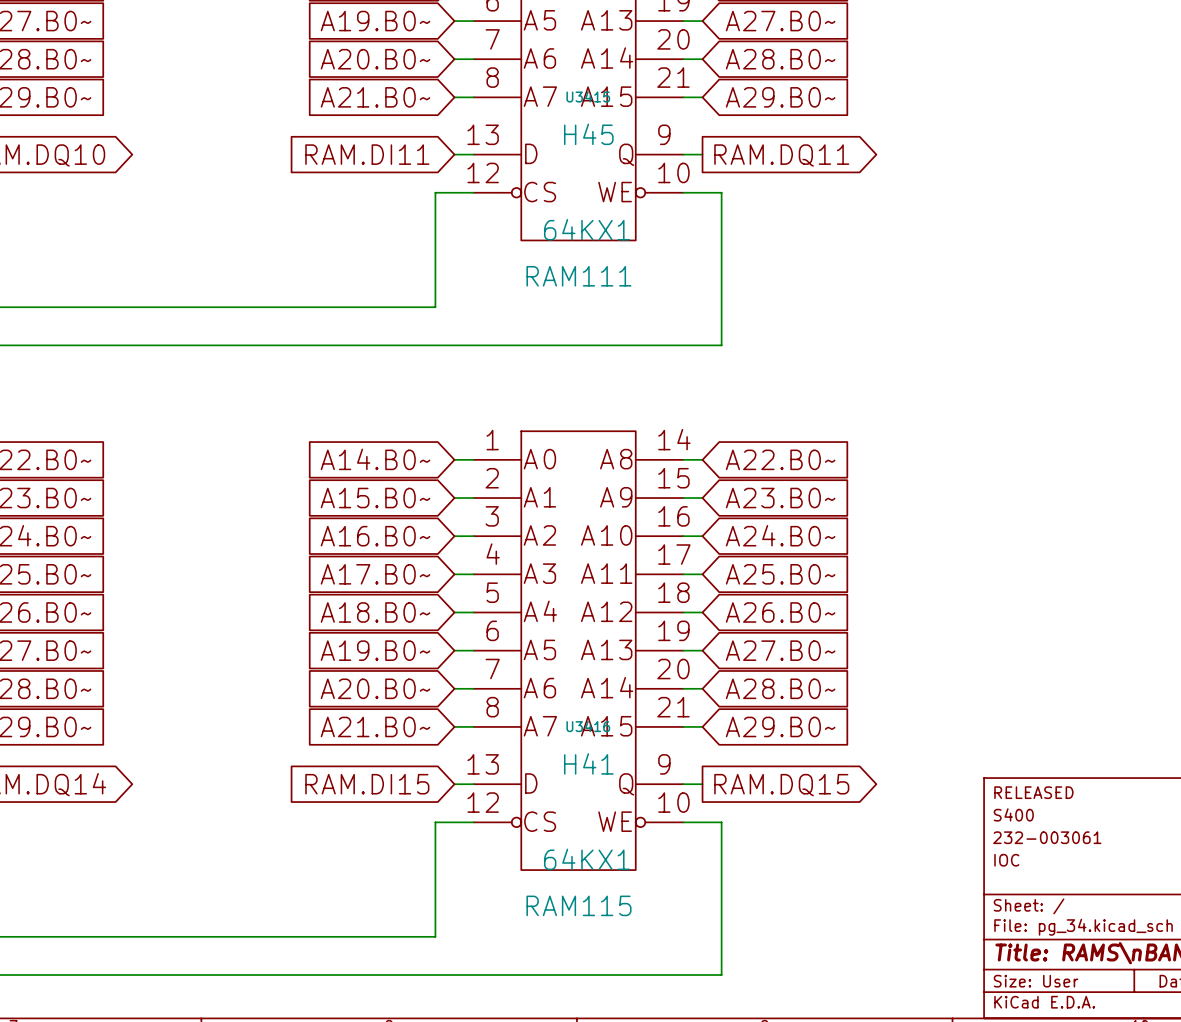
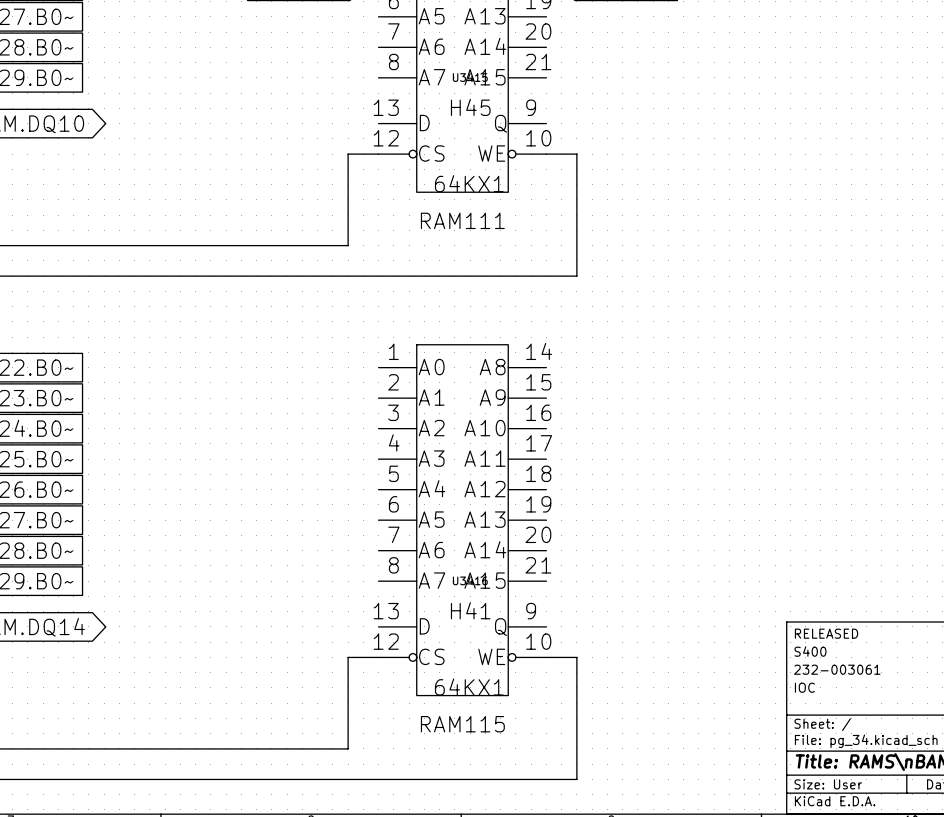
global label: A19.B0~ (375, 21) -> none
wire: (454, 21) (473, 21) -> none
wire: (683, 21) (702, 21) -> none
global label: A27.B0~ (780, 21) -> none
global label: A20.B0~ (375, 59) -> none
wire: (454, 59) (473, 59) -> none
wire: (683, 59) (702, 59) -> none
global label: A28.B0~ (780, 59) -> none
global label: A21.B0~ (375, 97) -> none
wire: (454, 97) (473, 97) -> none
wire: (683, 97) (702, 97) -> none
global label: A29.B0~ (780, 97) -> none
global label: RAM.DI11 (367, 154) -> none
wire: (454, 154) (473, 154) -> none
wire: (683, 154) (702, 154) -> none
global label: RAM.DQ11 (781, 155) -> none
global label: A14.B0~ (375, 459) -> none
wire: (454, 459) (473, 459) -> none
wire: (683, 459) (702, 459) -> none
global label: A22.B0~ (780, 459) -> none
global label: A15.B0~ (375, 498) -> none
wire: (454, 498) (473, 498) -> none
wire: (683, 498) (702, 498) -> none
global label: A23.B0~ (780, 498) -> none
global label: A24.B0~ (780, 535) -> none
global label: A16.B0~ (375, 536) -> none
wire: (454, 536) (473, 536) -> none
wire: (683, 536) (702, 536) -> none
global label: A17.B0~ (375, 574) -> none
wire: (454, 574) (473, 574) -> none
wire: (683, 574) (702, 574) -> none
global label: A25.B0~ (780, 574) -> none
global label: A18.B0~ (375, 612) -> none
wire: (454, 612) (473, 612) -> none
wire: (683, 612) (702, 612) -> none
global label: A26.B0~ (780, 612) -> none
global label: A19.B0~ (375, 650) -> none
wire: (454, 650) (473, 650) -> none
wire: (683, 650) (702, 650) -> none
global label: A27.B0~ (780, 650) -> none
global label: A20.B0~ (375, 688) -> none
wire: (454, 688) (473, 688) -> none
wire: (683, 688) (702, 688) -> none
global label: A28.B0~ (780, 688) -> none
global label: A21.B0~ (375, 726) -> none
wire: (454, 726) (473, 726) -> none
wire: (683, 726) (702, 726) -> none
global label: A29.B0~ (780, 726) -> none
global label: RAM.DI15 (367, 784) -> none
wire: (454, 784) (473, 784) -> none
wire: (683, 784) (702, 784) -> none
global label: RAM.DQ15 (781, 785) -> none

